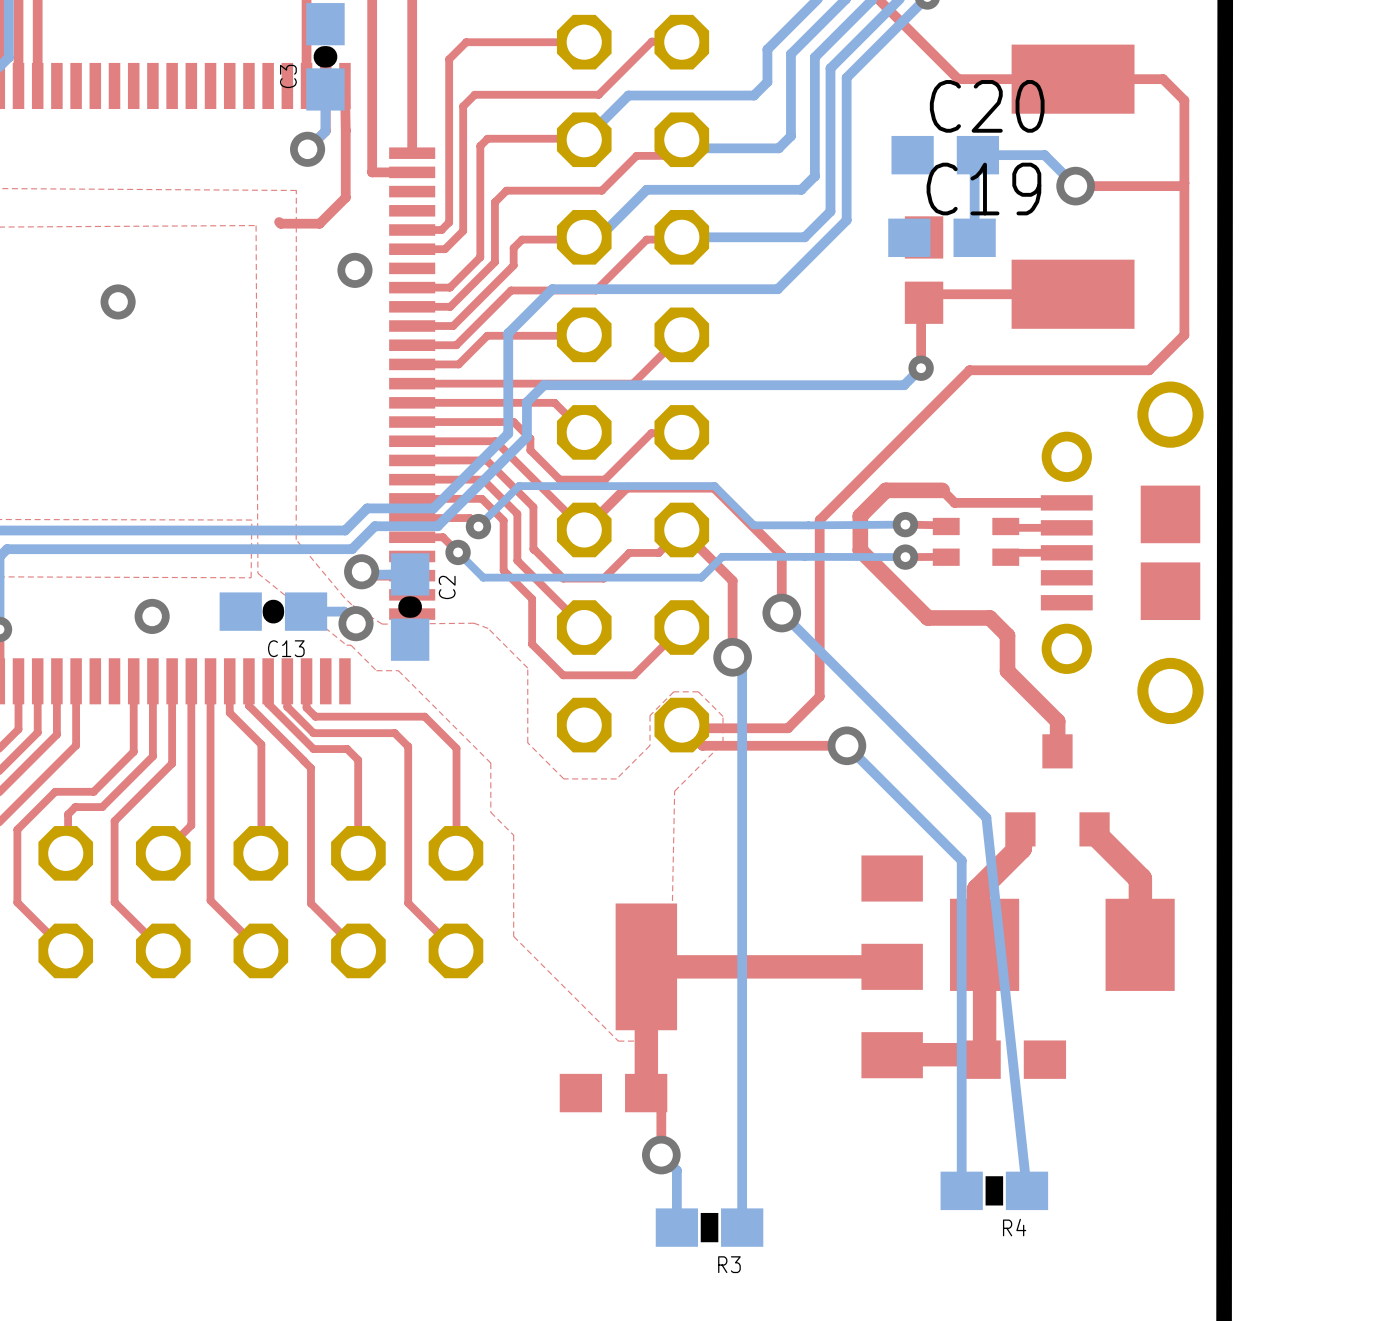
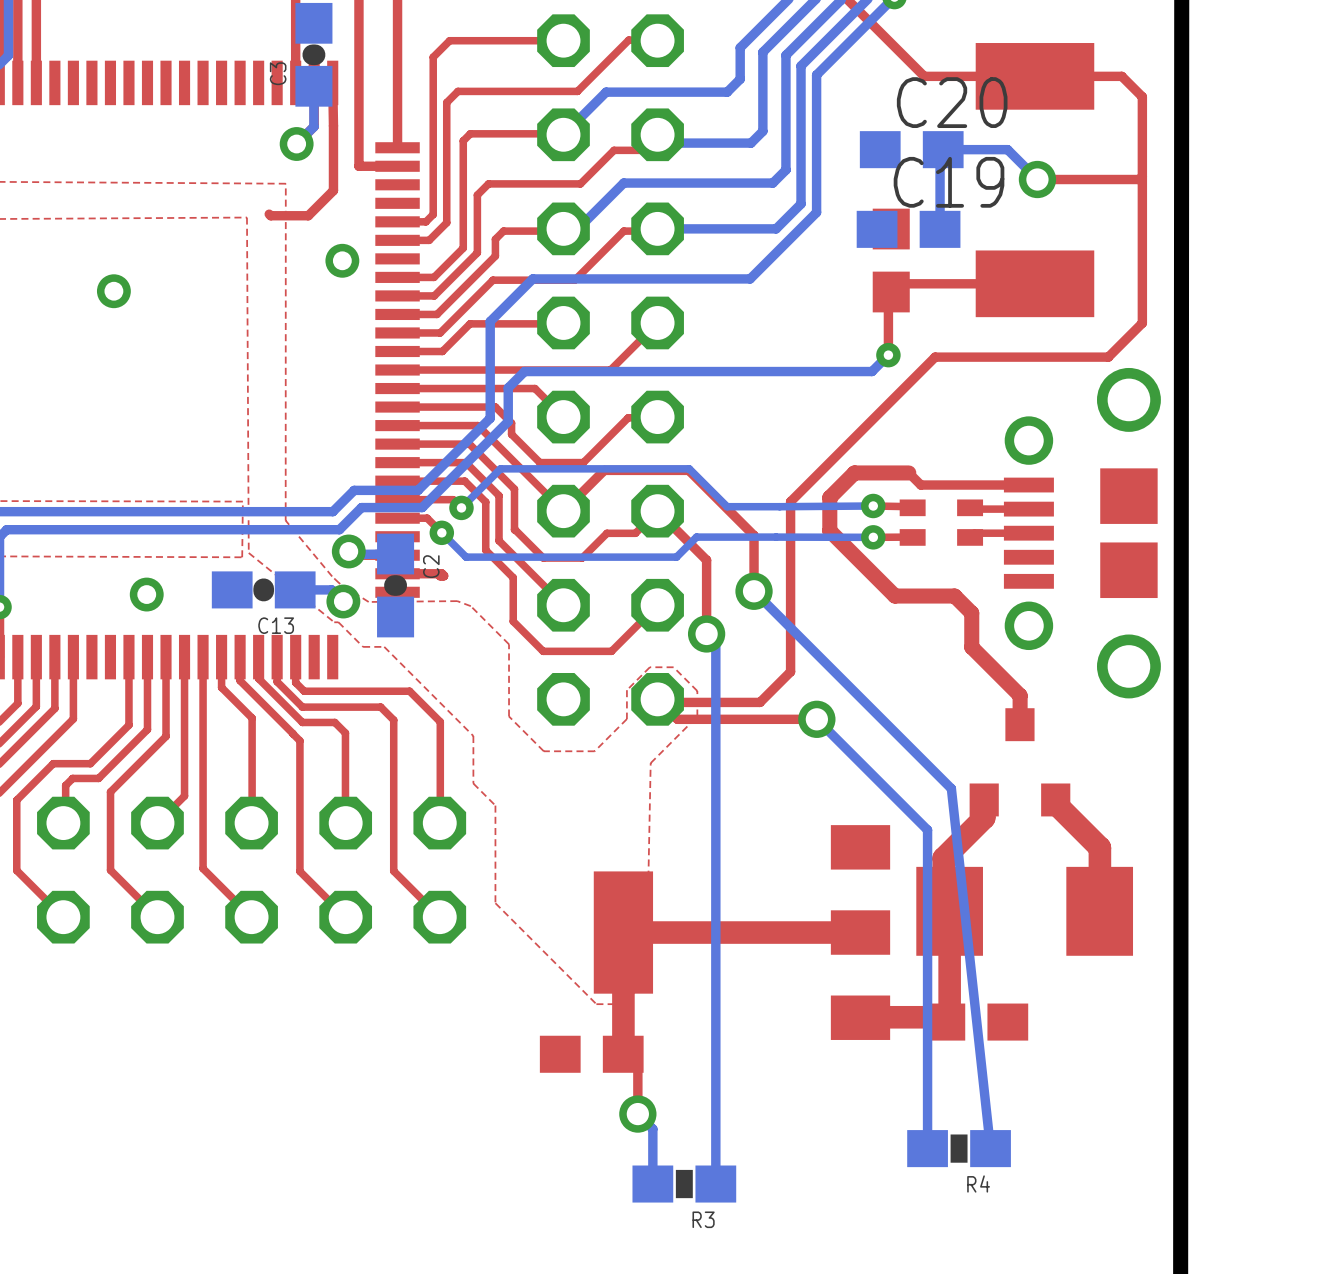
top track: none -> (397, 573) (441, 573) (443, 575) (440, 575)

